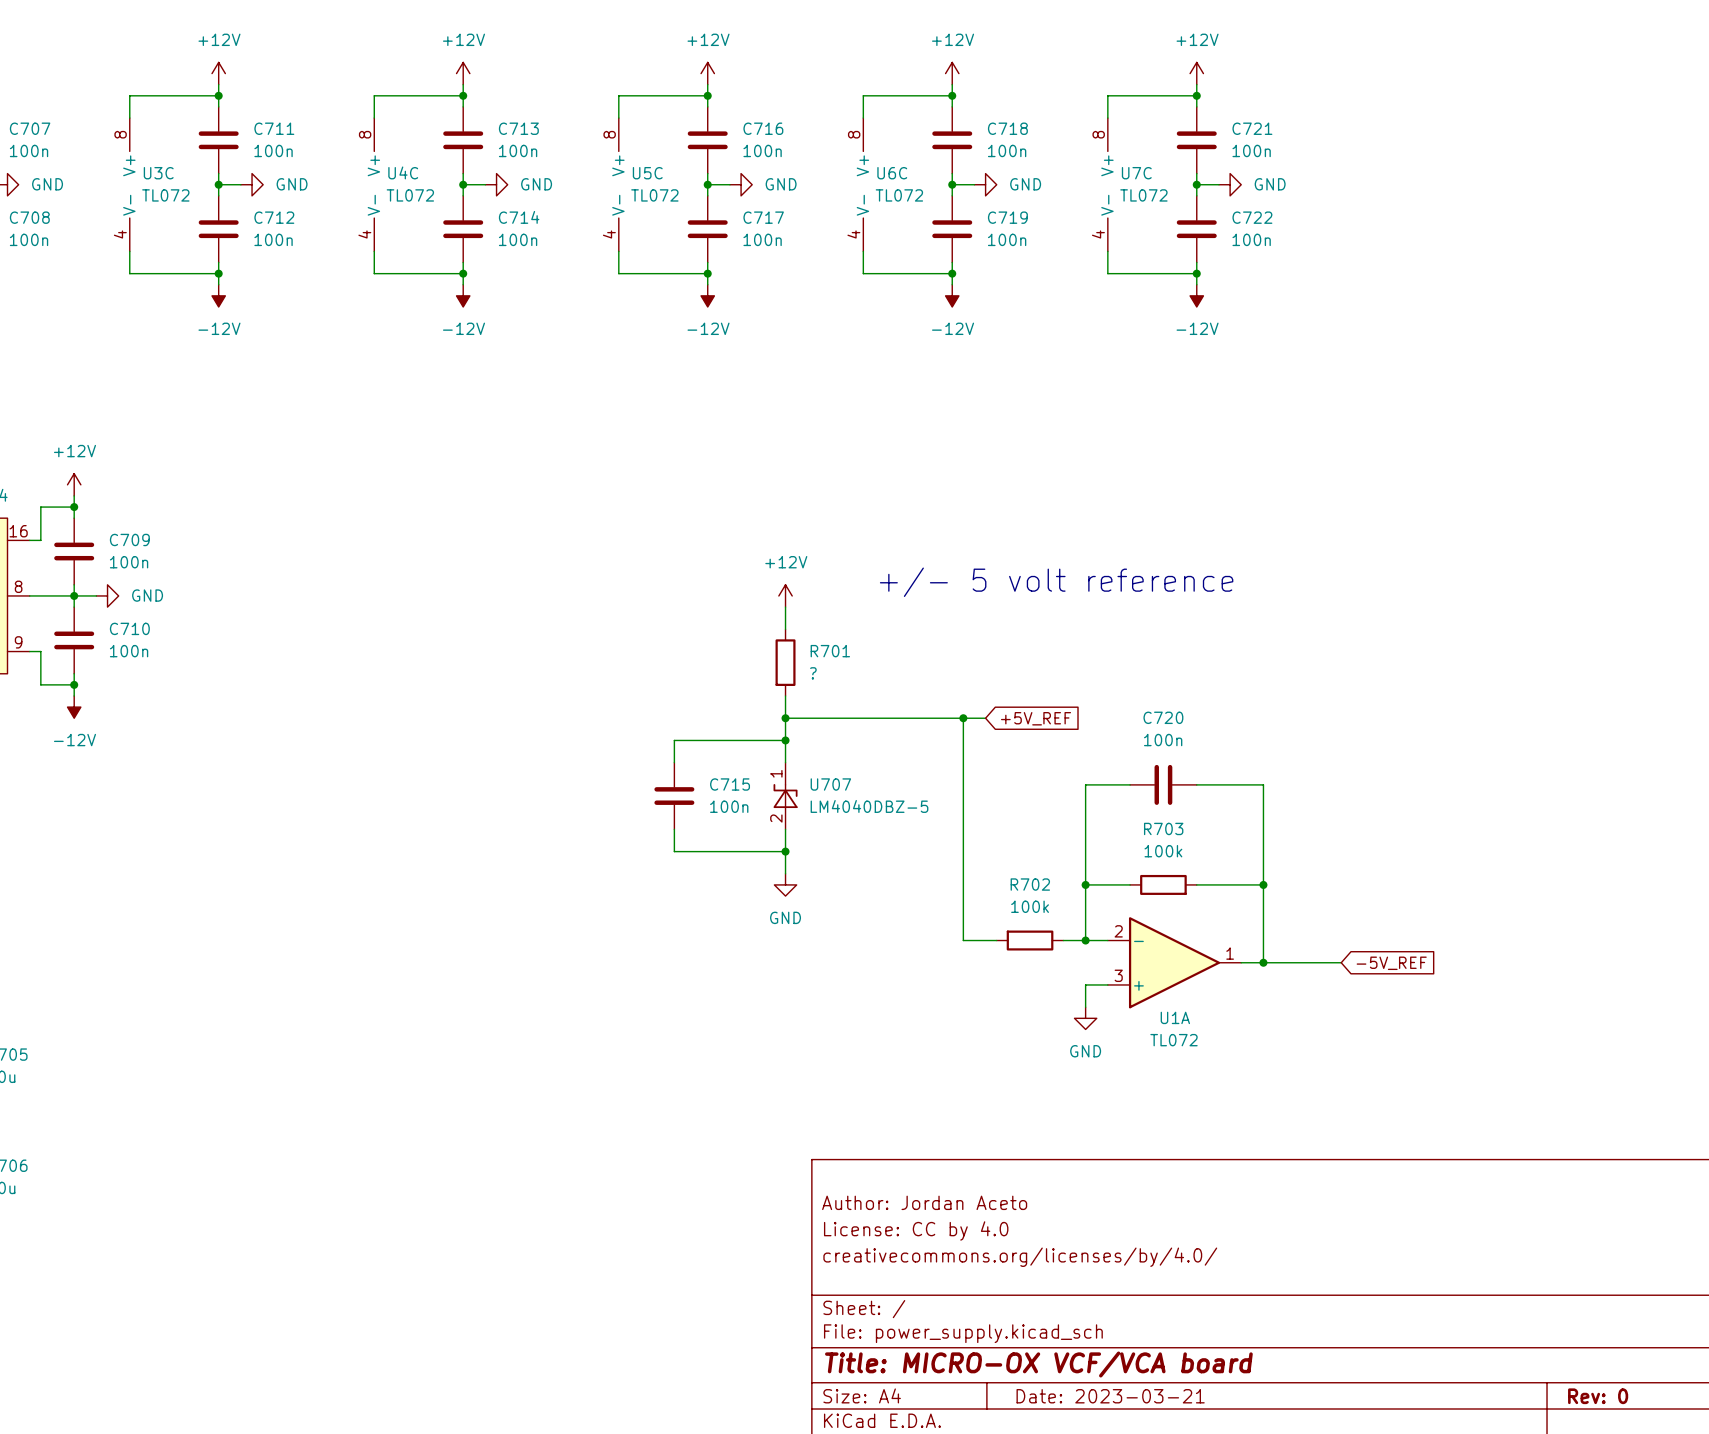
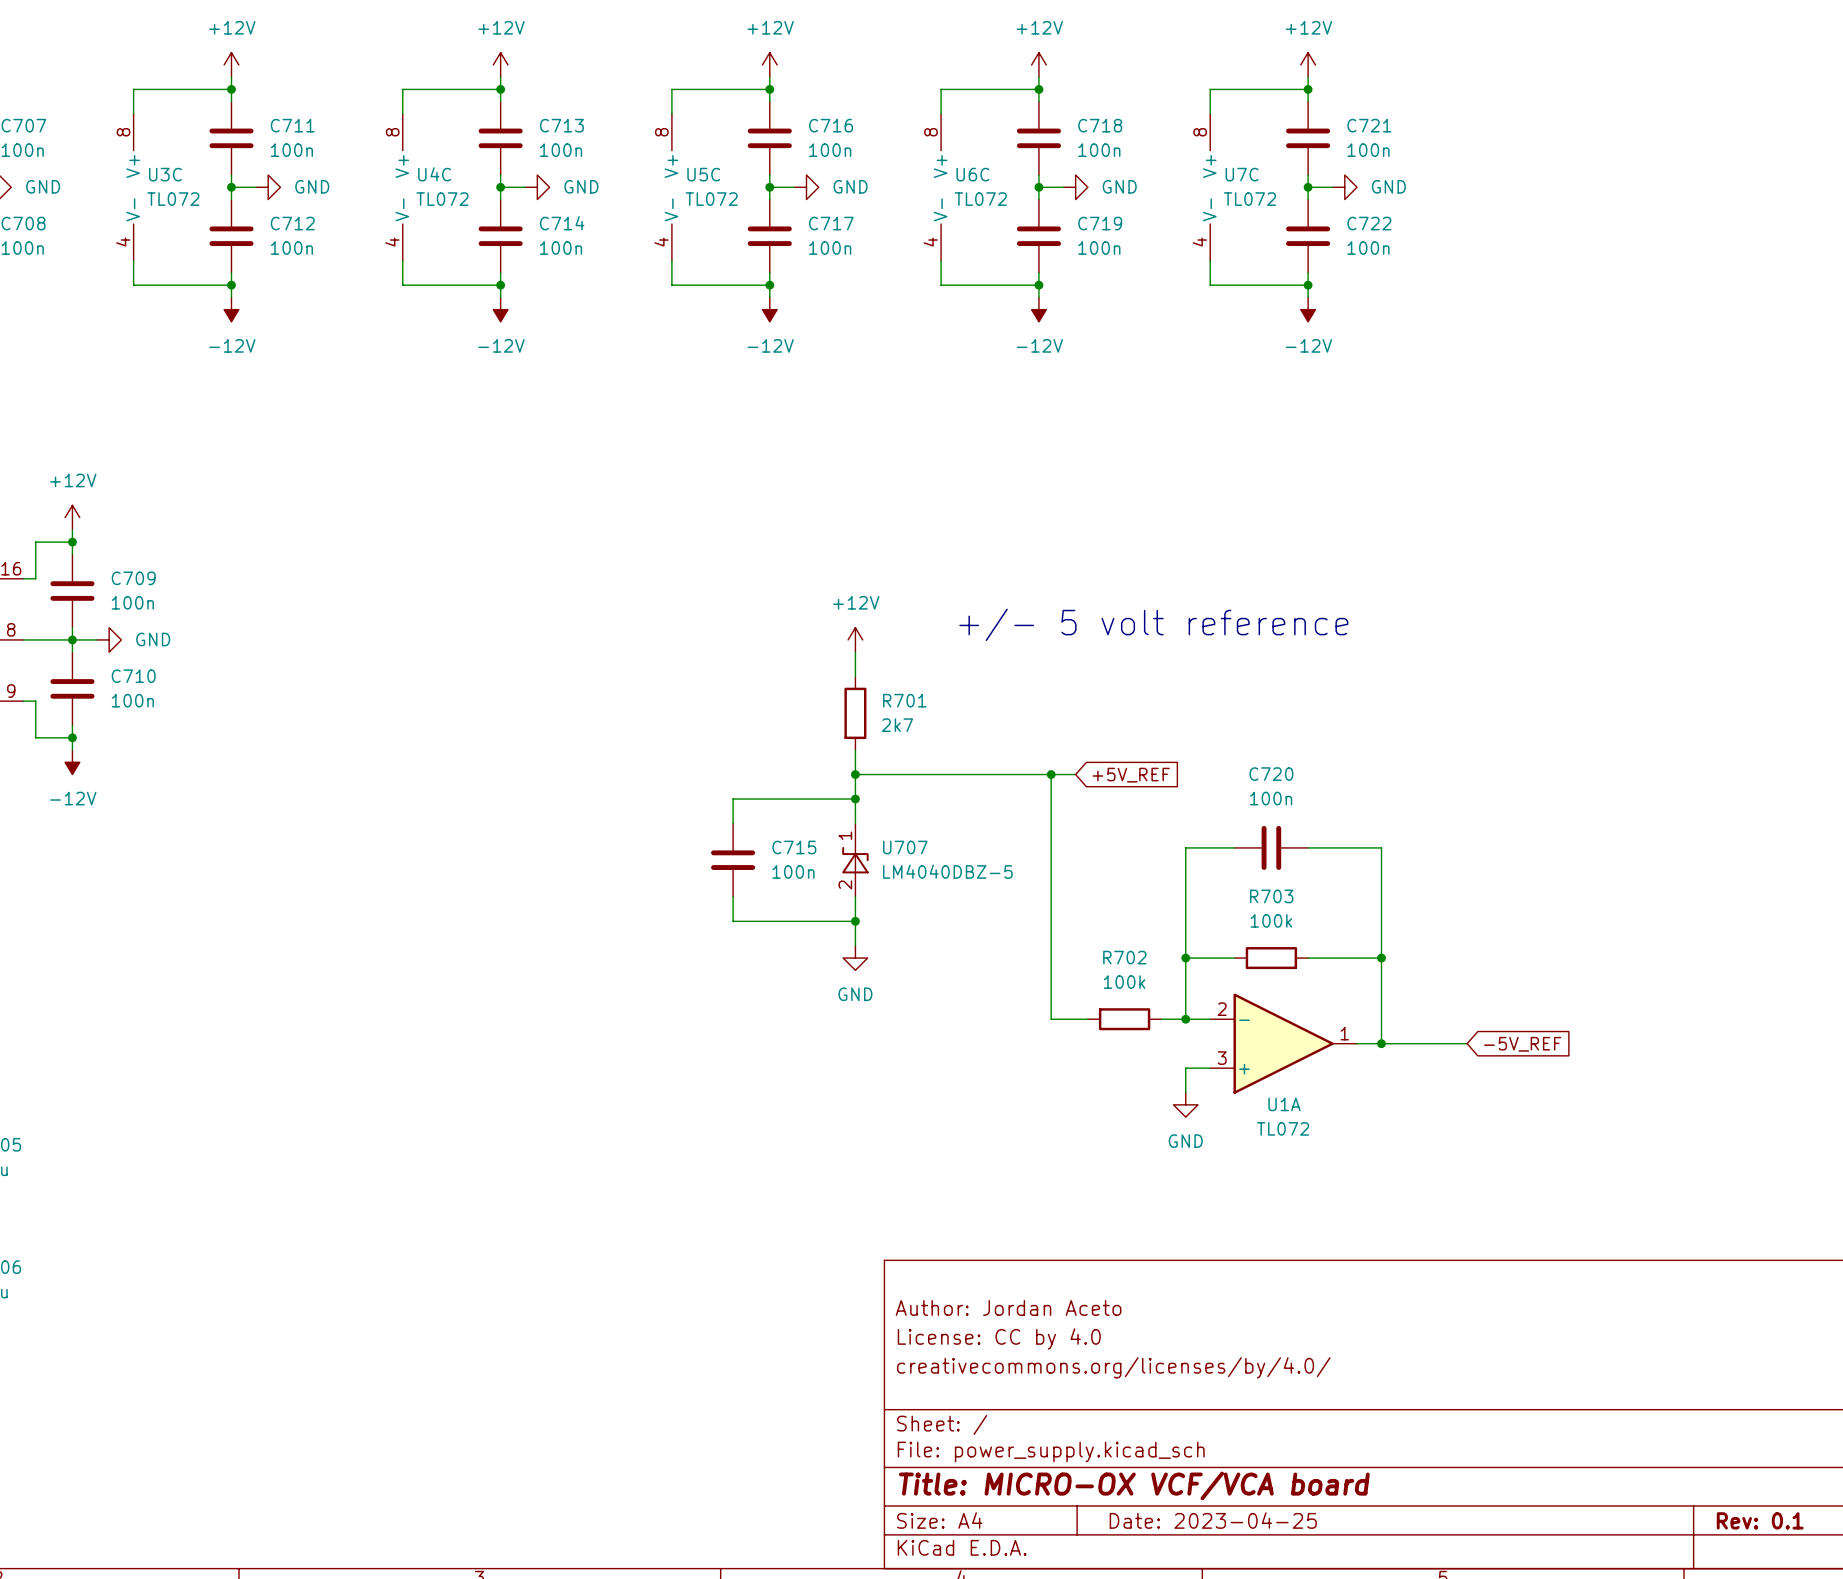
R701 value: ? (813, 673) -> 2k7 (897, 725)
title block: Date: 2023-03-21 (1110, 1396) -> Date: 2023-04-25 (1213, 1520)
title block: Rev: 0 (1598, 1396) -> Rev: 0.1 (1760, 1520)

